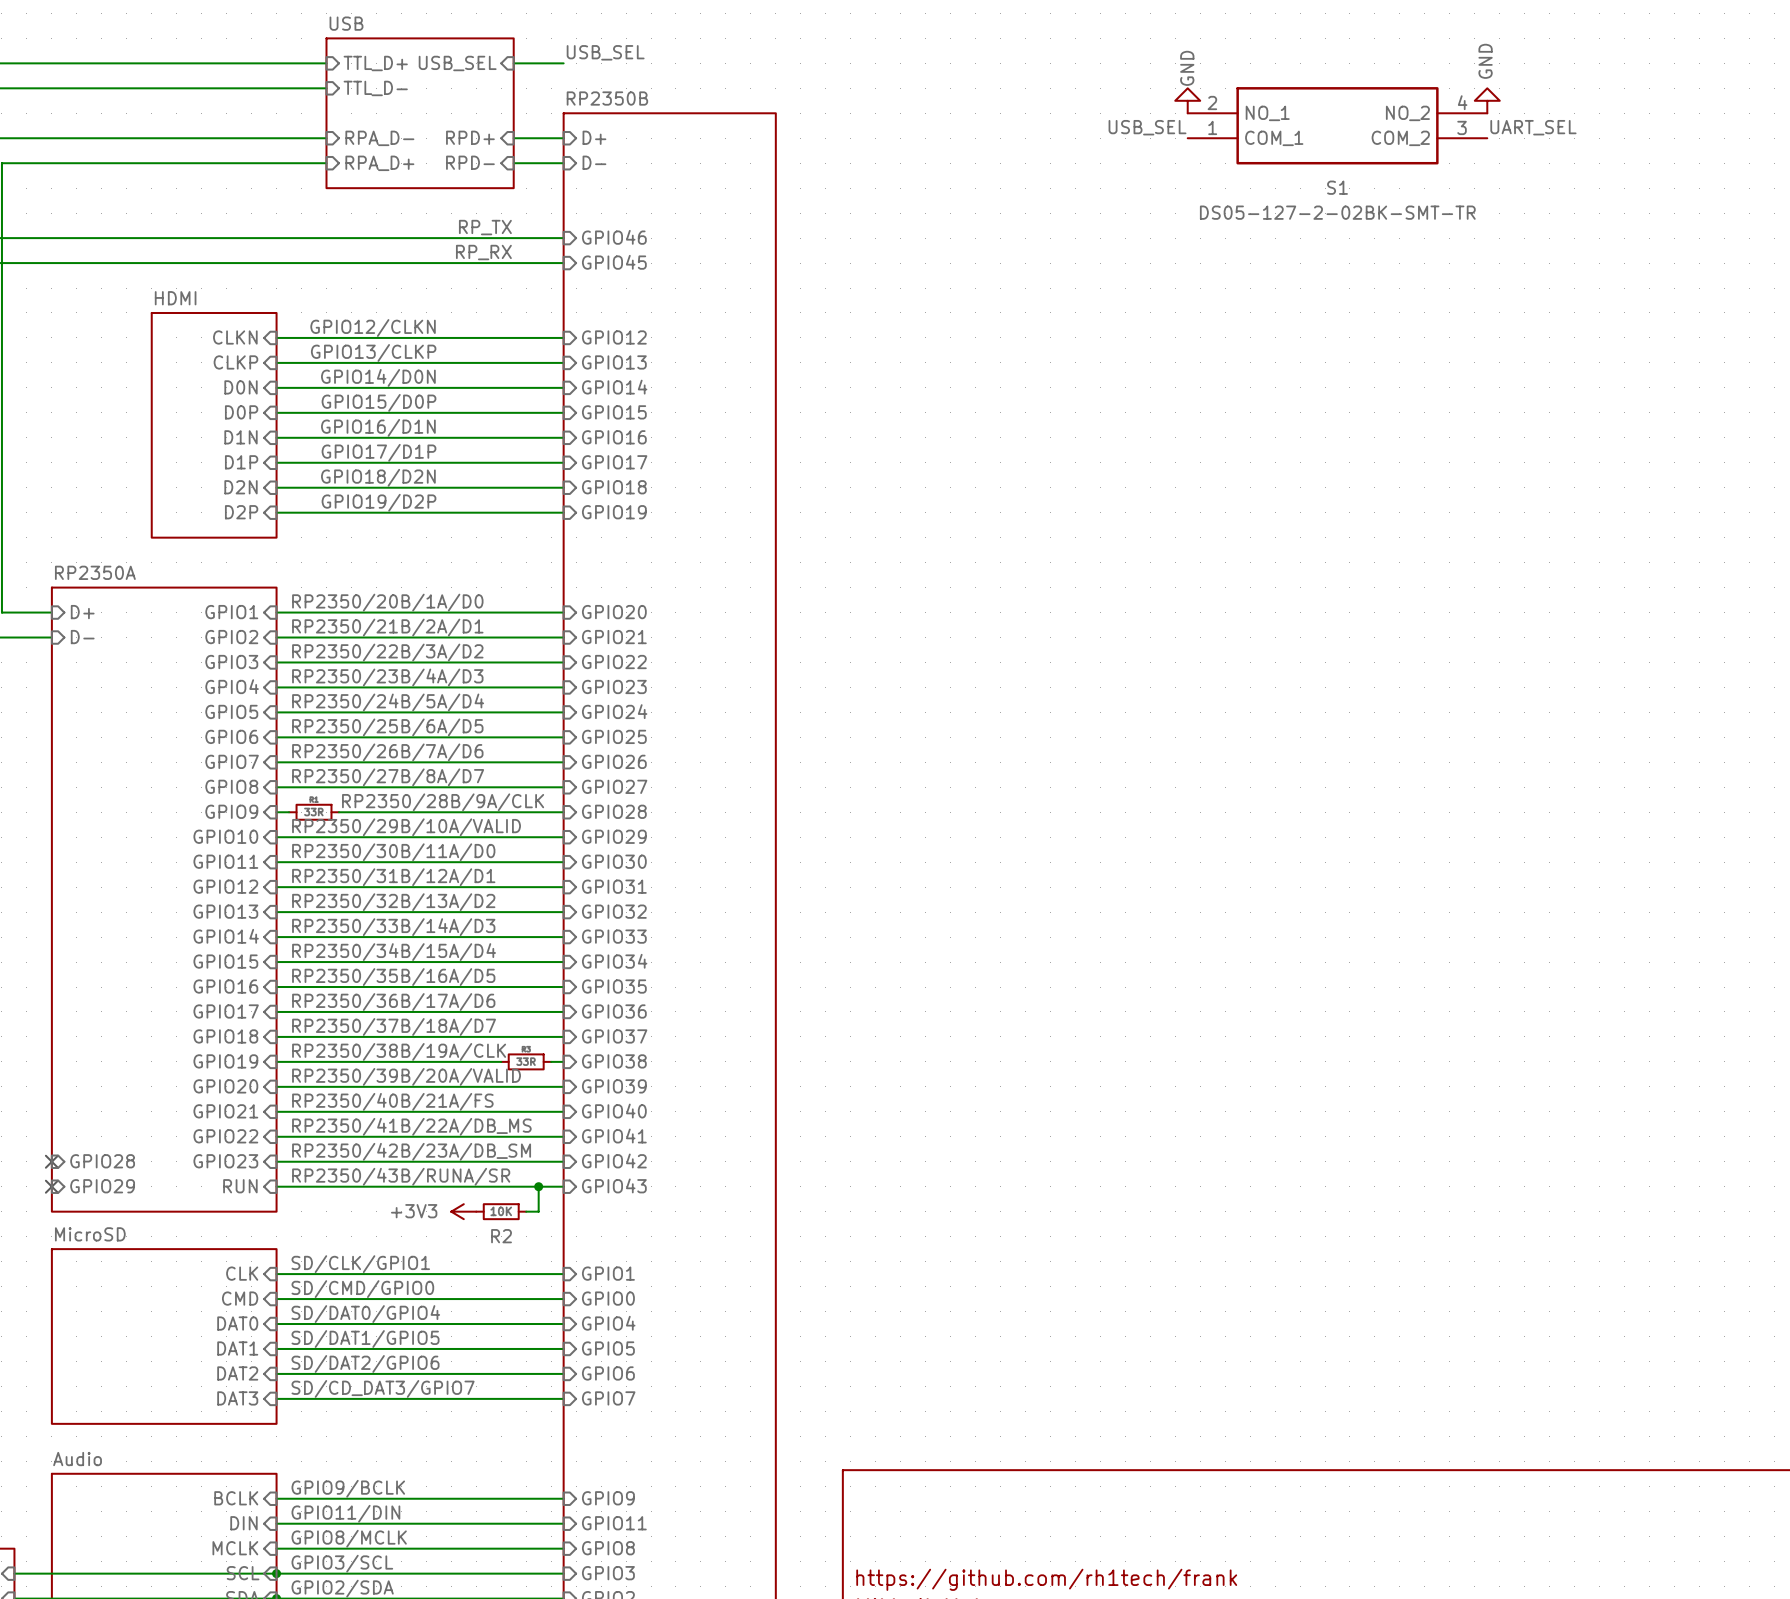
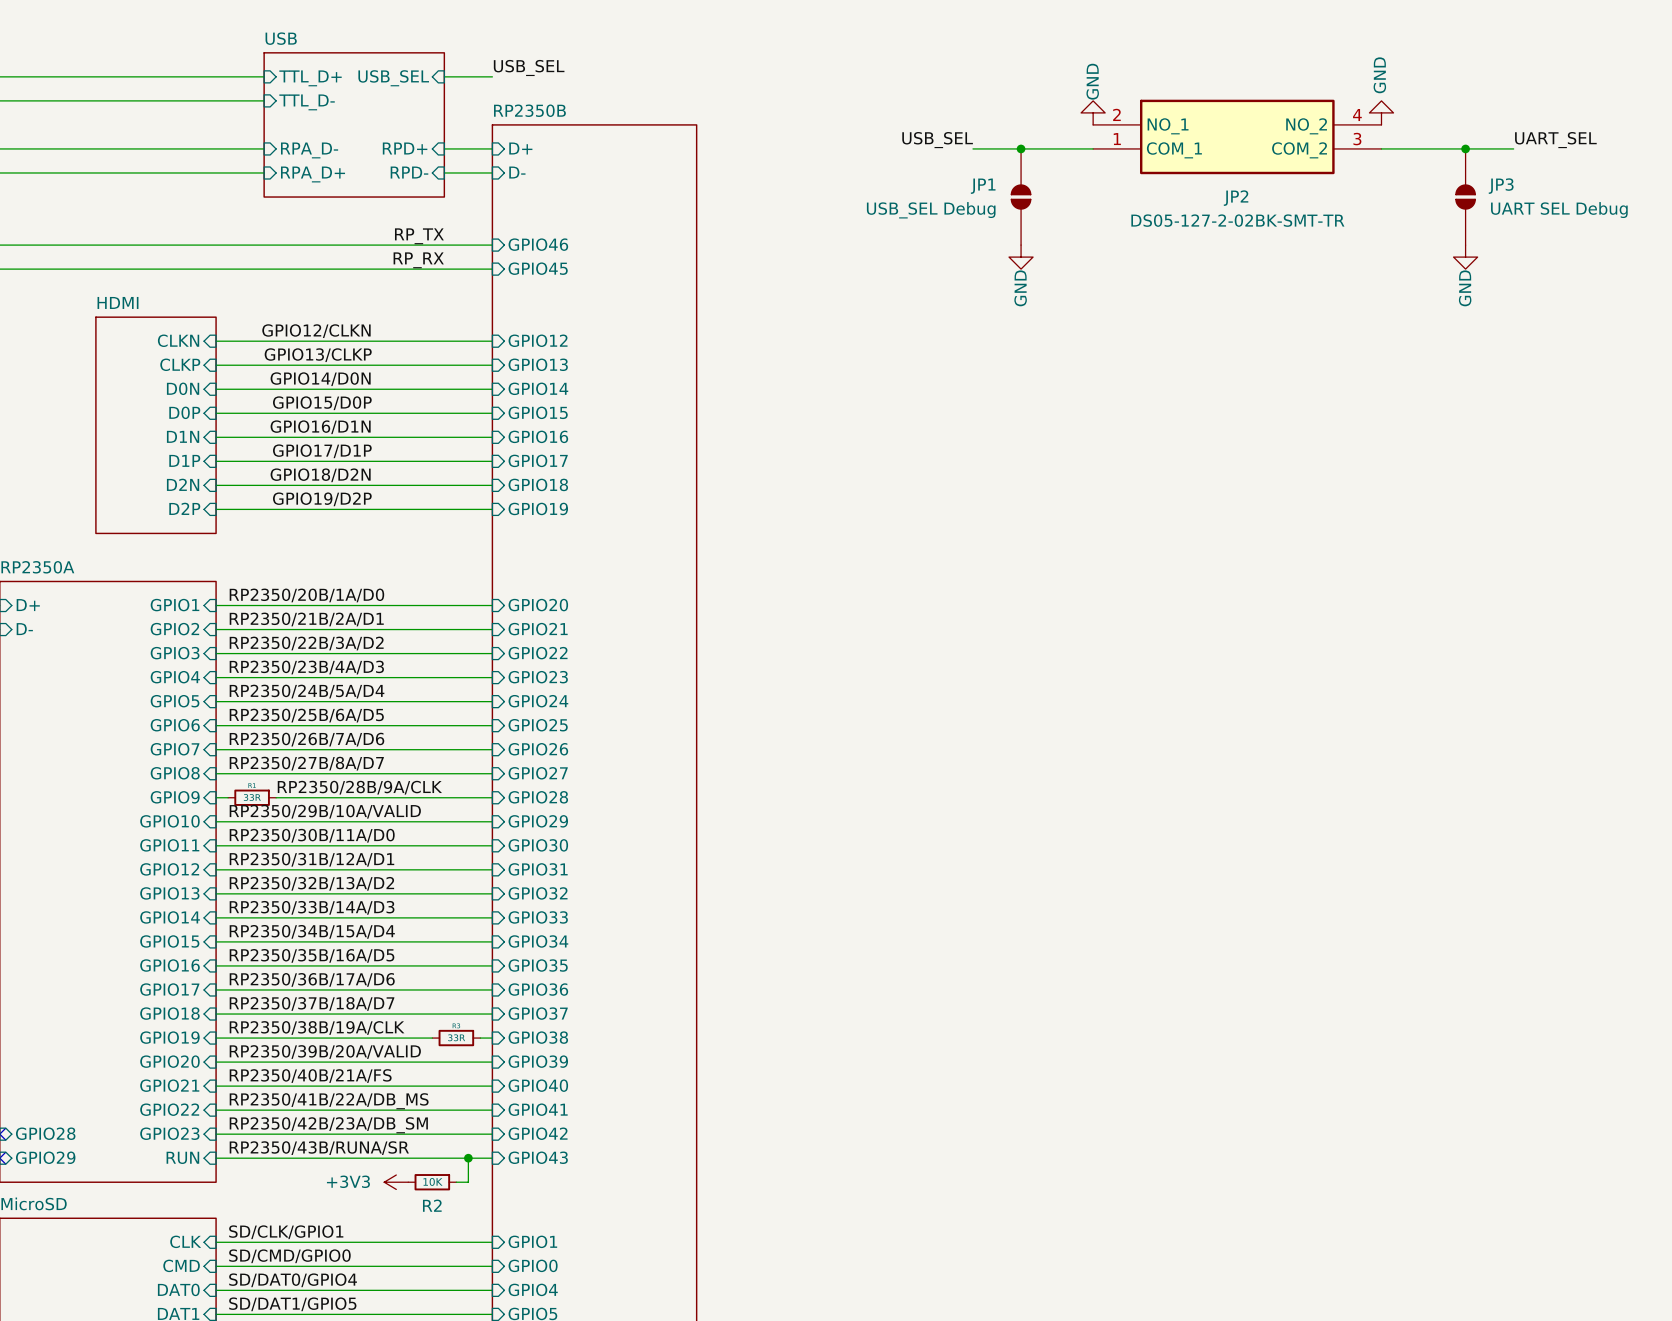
label position: USB_SEL (1147, 127) -> USB_SEL (937, 140)
label position: UART_SEL (1533, 127) -> UART_SEL (1555, 140)
wire: none -> (972, 148) (1093, 148)
junction: none -> (1021, 148)
wire: none -> (1381, 148) (1513, 148)
junction: none -> (1465, 148)
S1 name: S1 (1337, 187) -> JP2 (1236, 198)
JP1: none -> USB_SEL Debug (1021, 197)
JP3: none -> UART SEL Debug (1465, 197)
power symbol: none -> GND (1021, 257)
power symbol: none -> GND (1465, 257)

